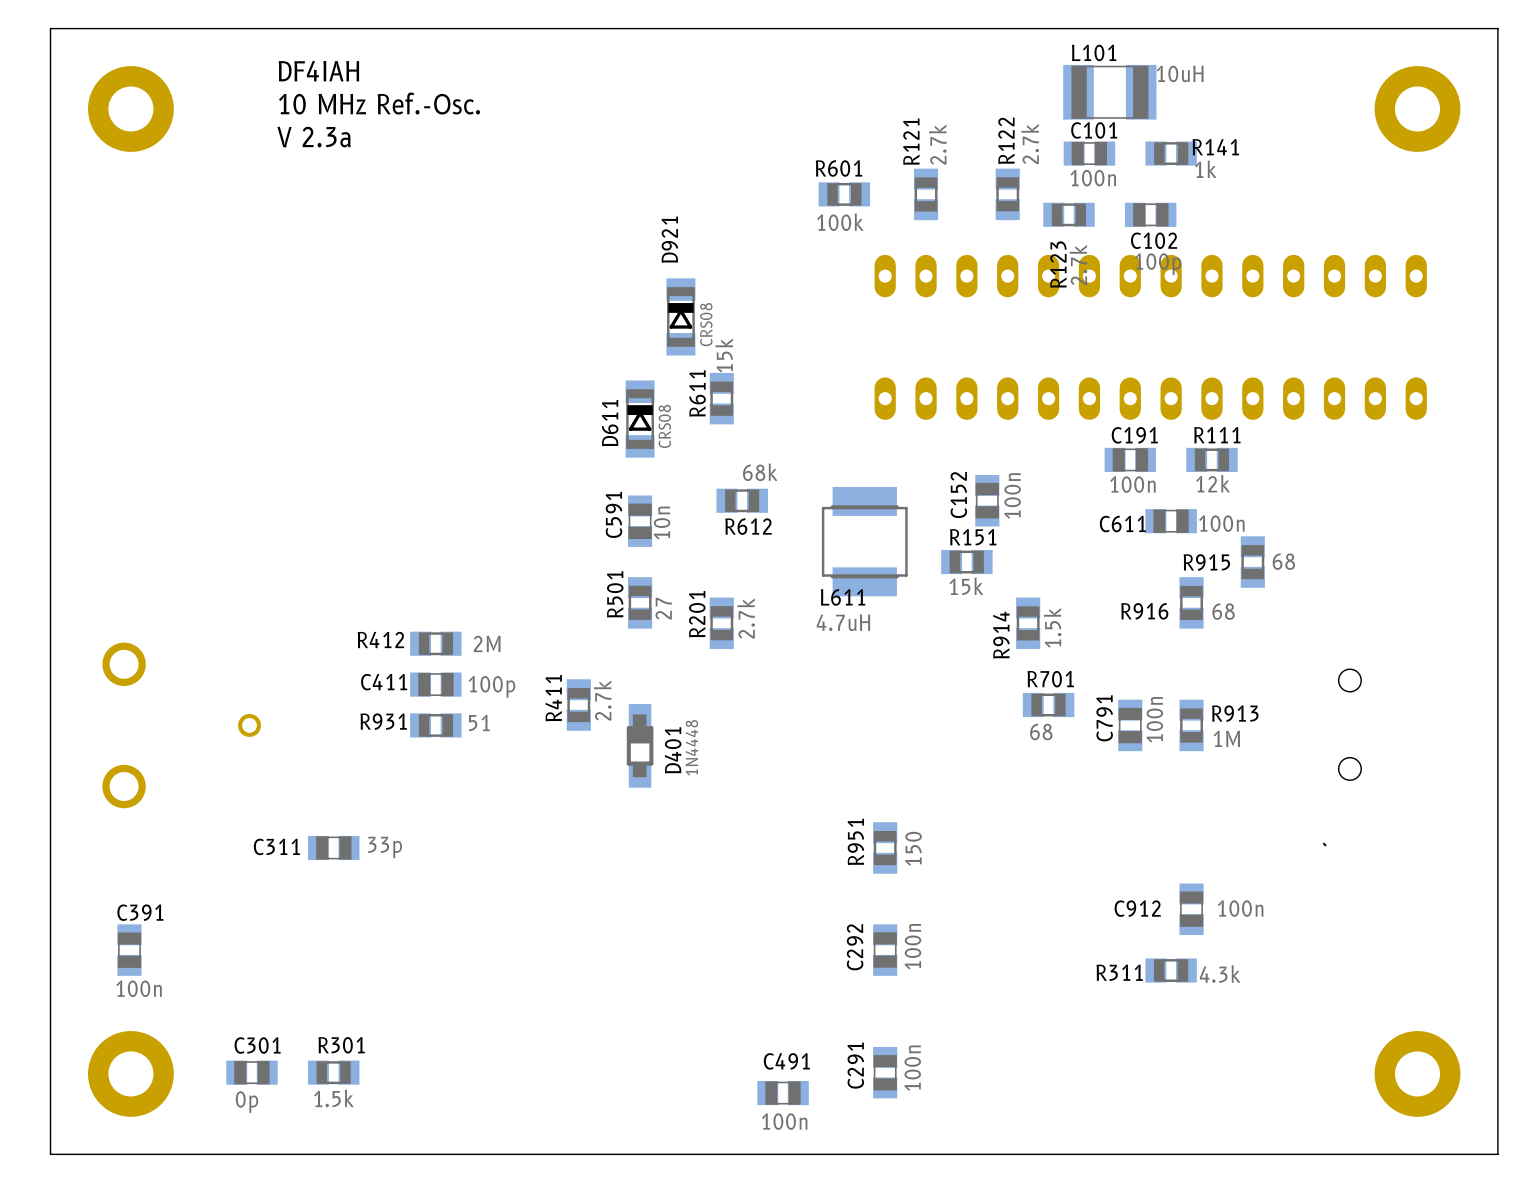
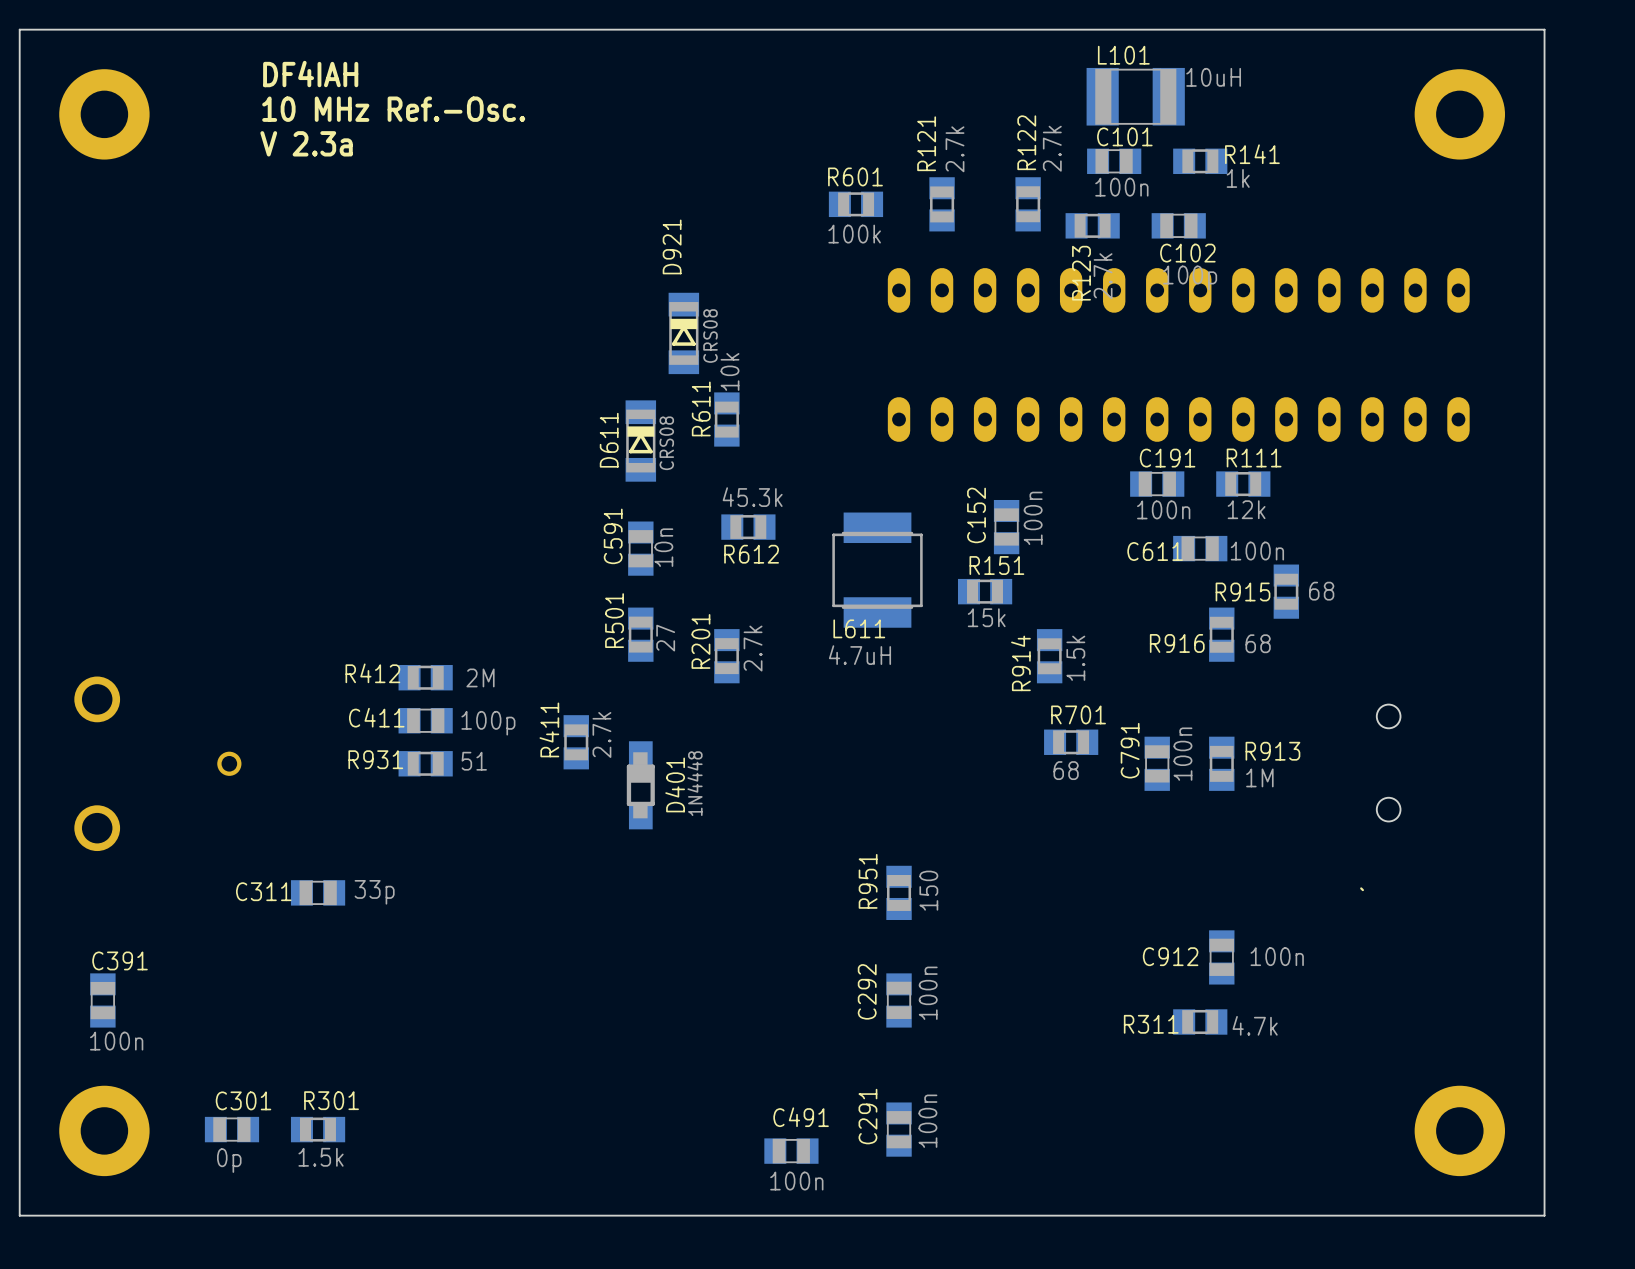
R611 value: 15k (724, 355) -> 10k (730, 371)
R612 value: 68k (760, 472) -> 45.3k (752, 497)
R311 value: 4.3k (1220, 974) -> 4.7k (1255, 1025)

